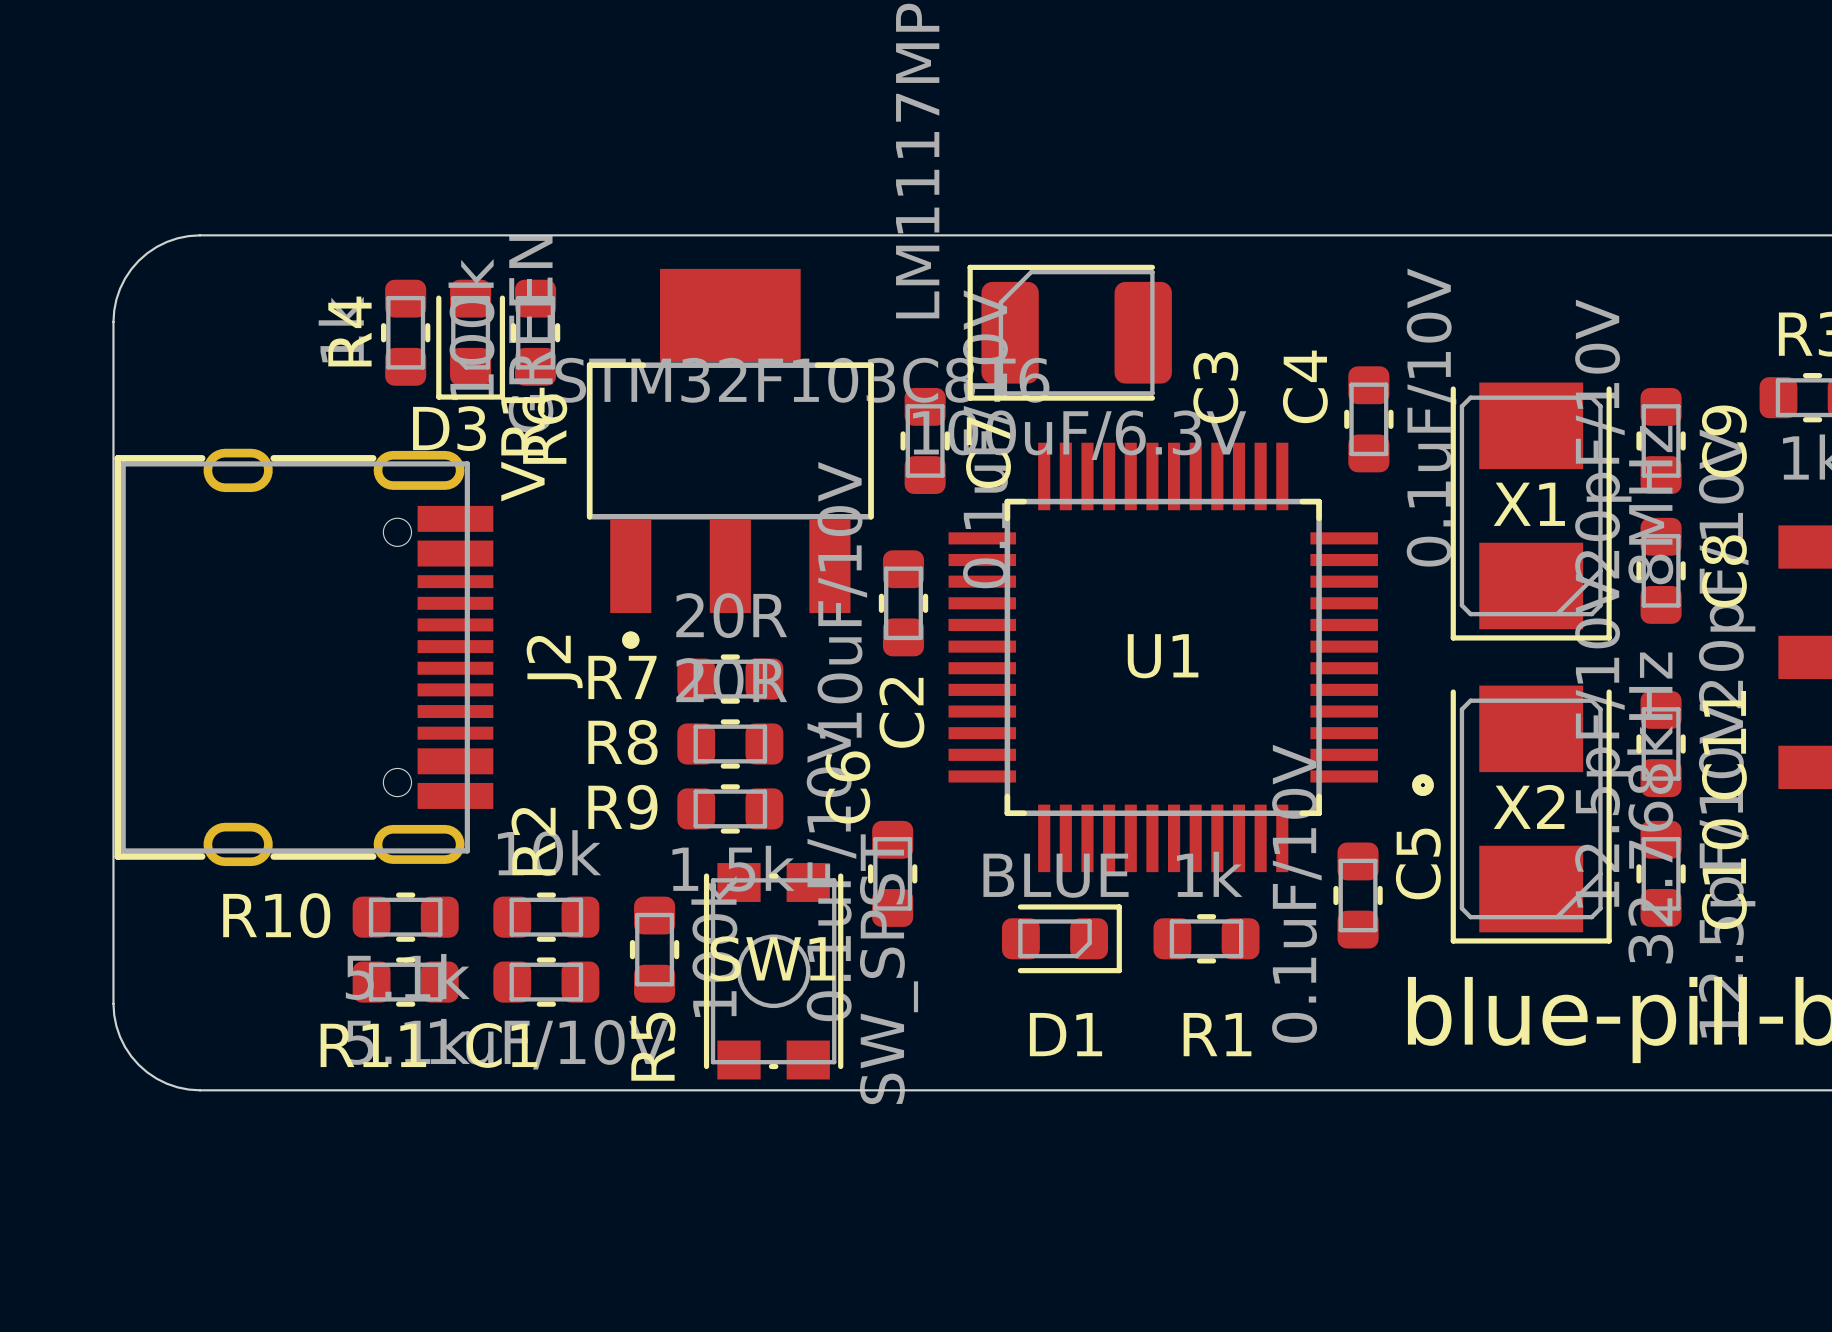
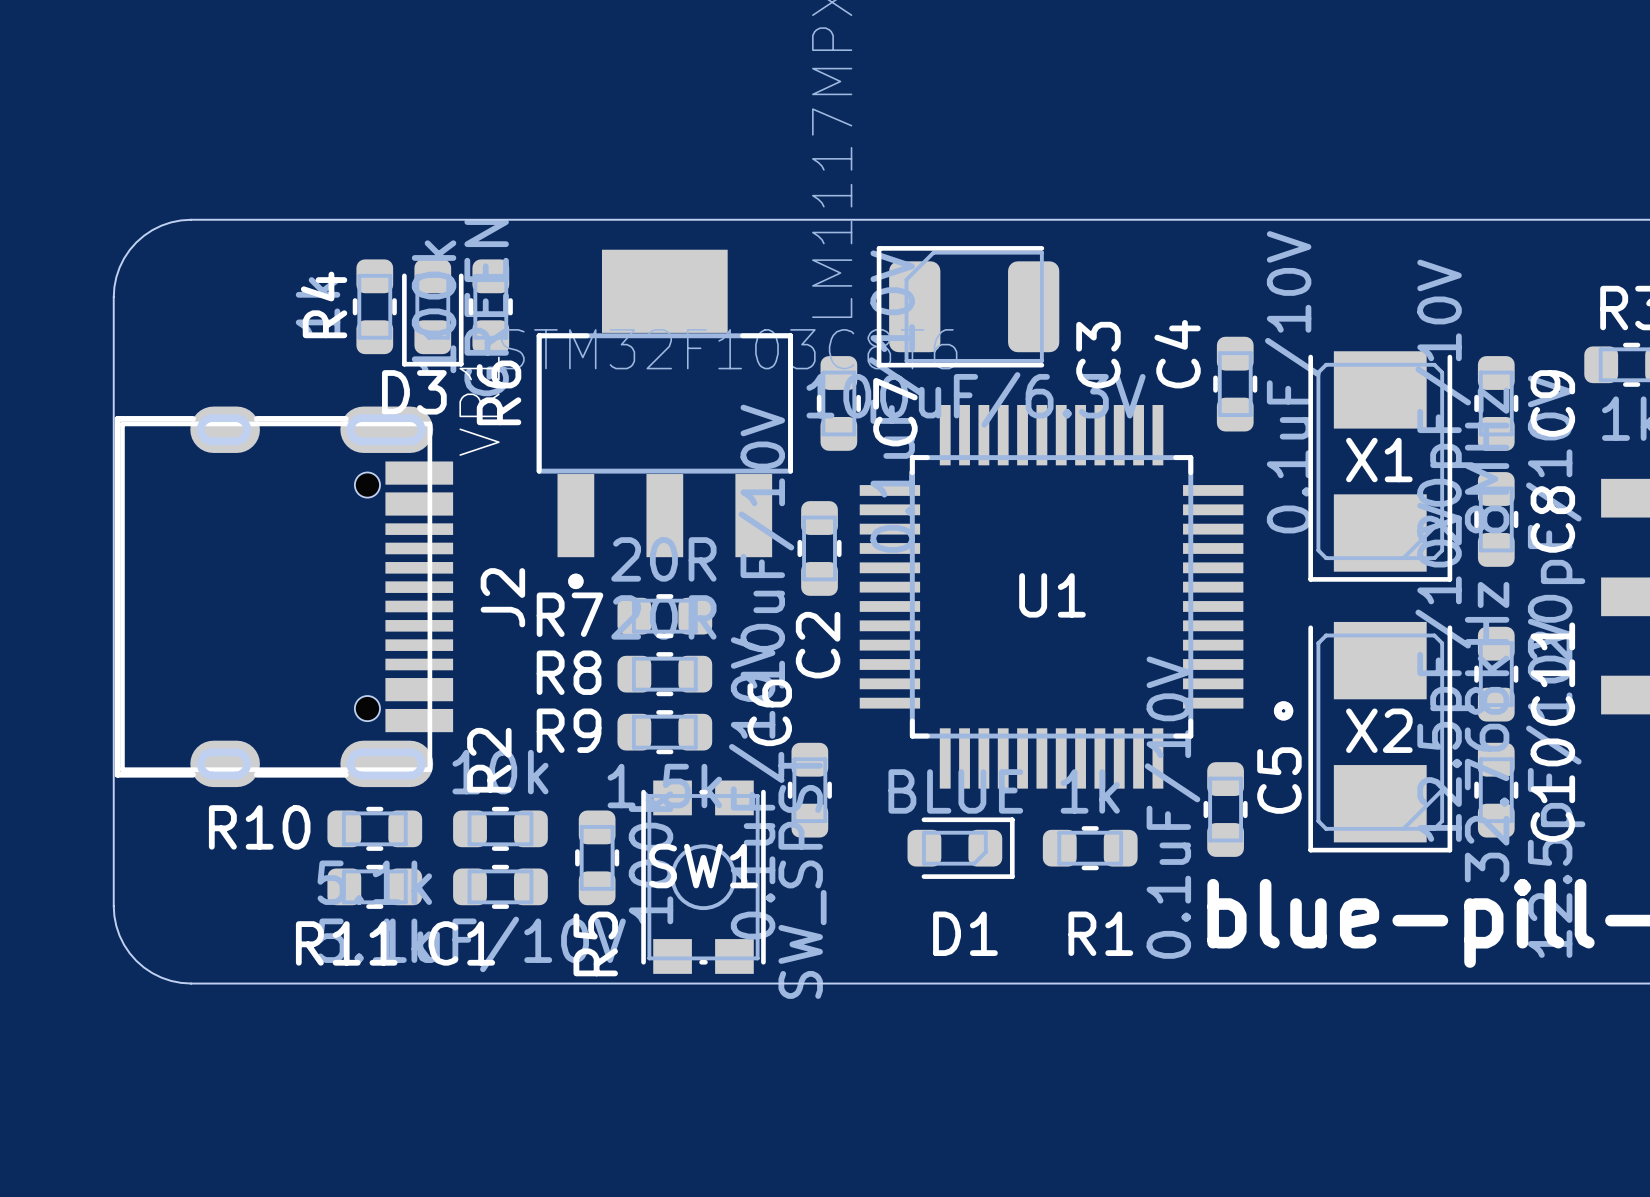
J2 footprint: [114, 448, 494, 867] -> [114, 406, 454, 788]

